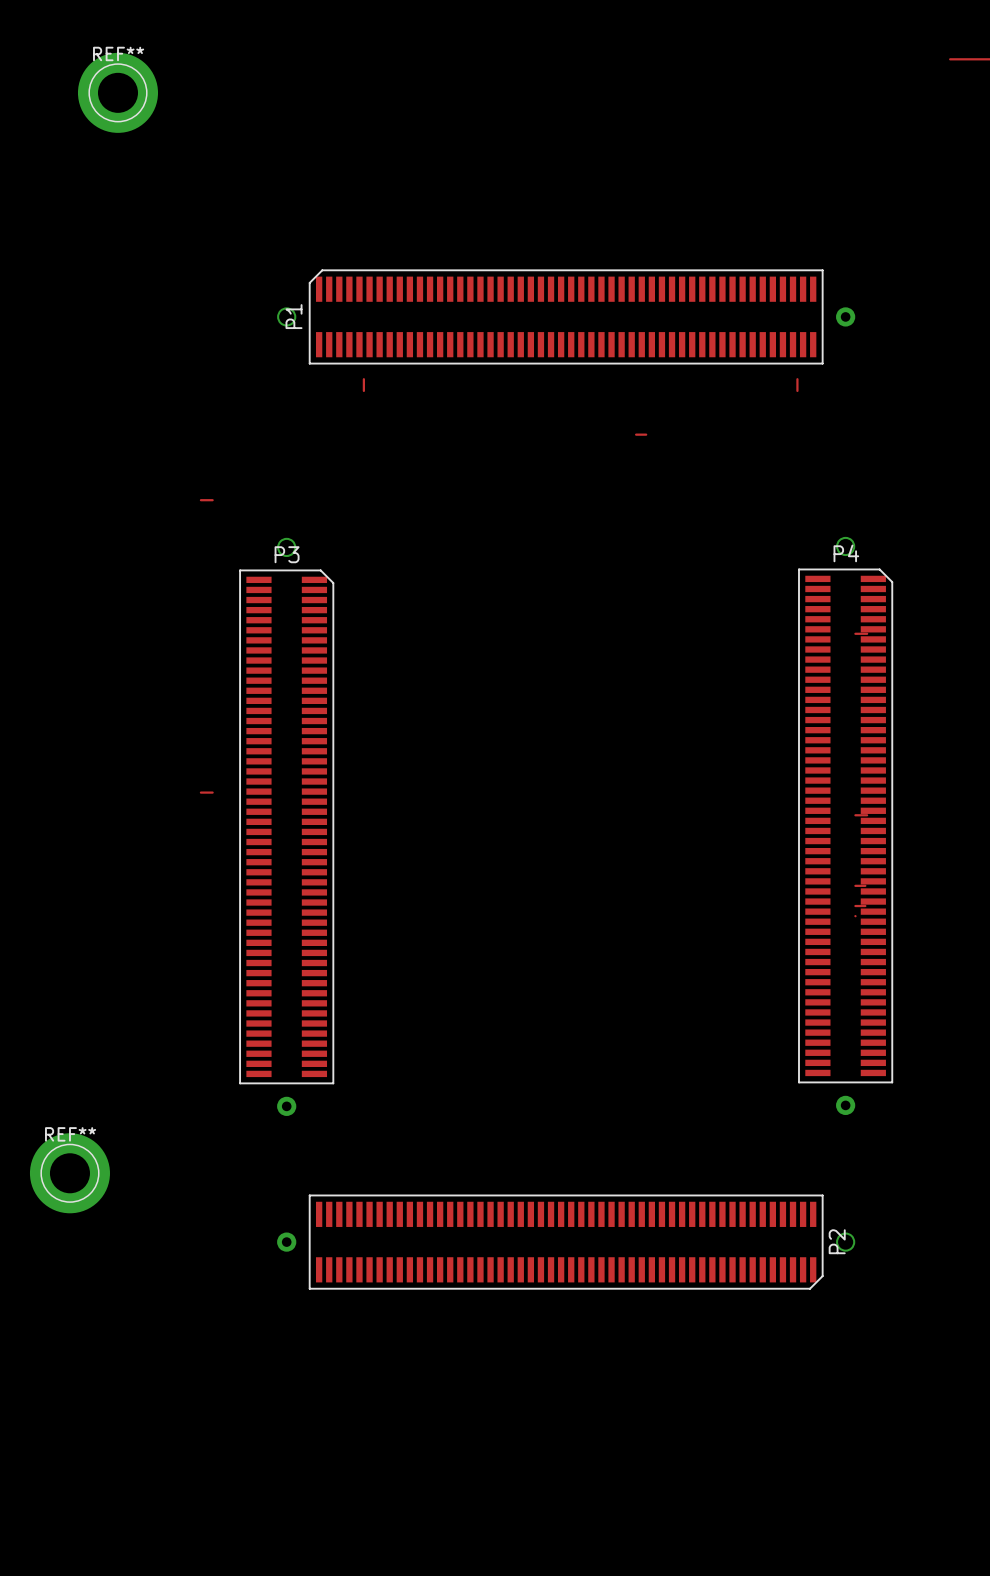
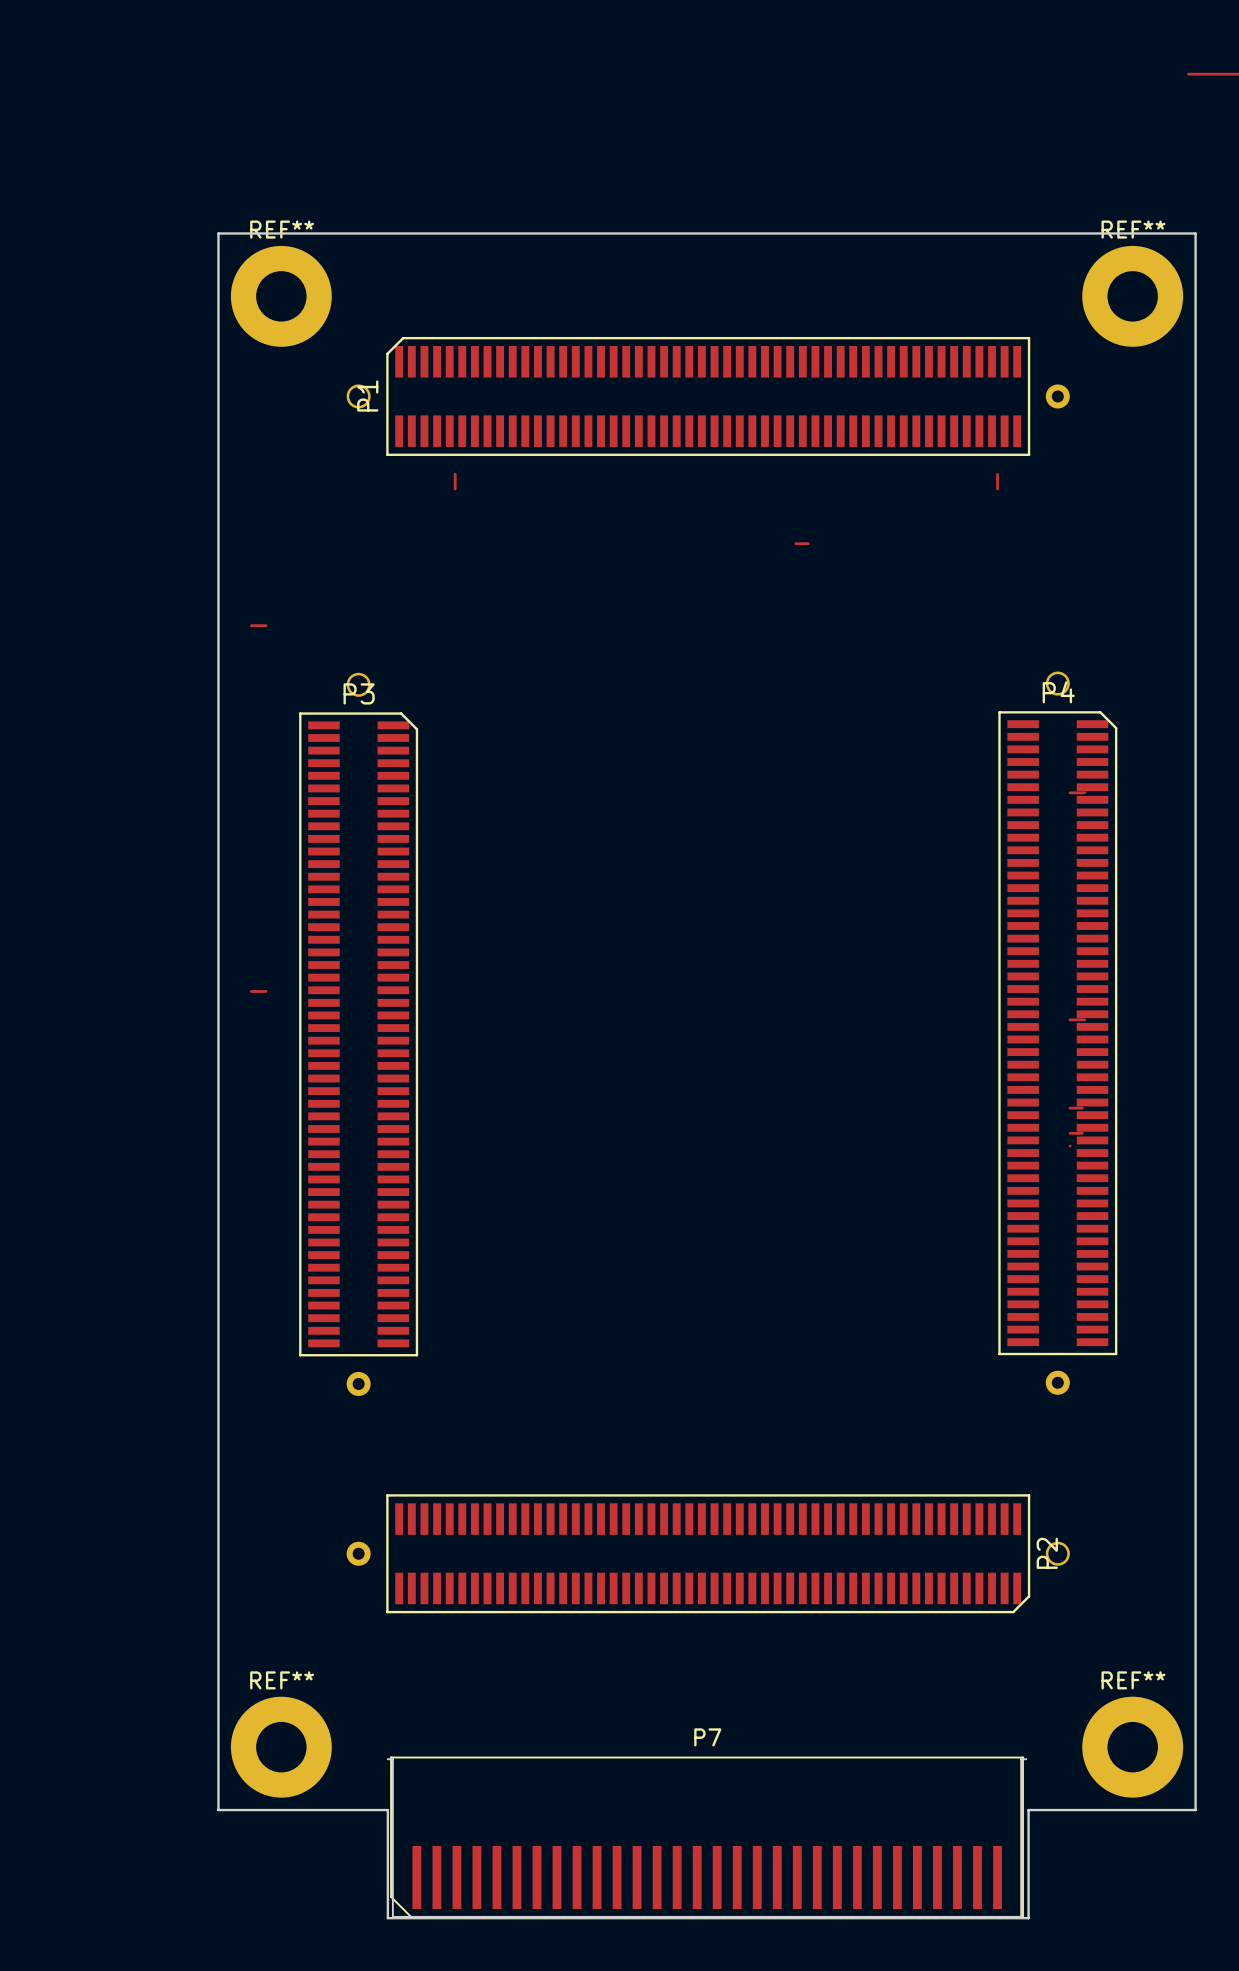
REF**: (117, 92) -> none
board edge: none -> (218, 233) (1195, 233) (1195, 1810) (1028, 1810) (1028, 1918) (387, 1918) (387, 1810) (218, 1810) (218, 233)
REF**: none -> (281, 296)
REF**: none -> (1132, 296)
REF**: (69, 1173) -> none
REF**: none -> (281, 1747)
REF**: none -> (1132, 1747)
P7: none -> (707, 1837)

